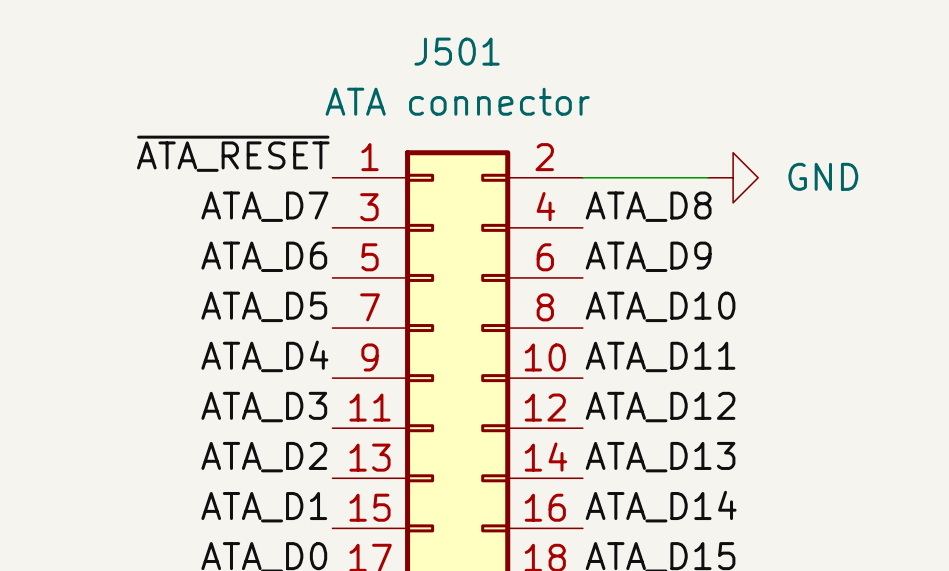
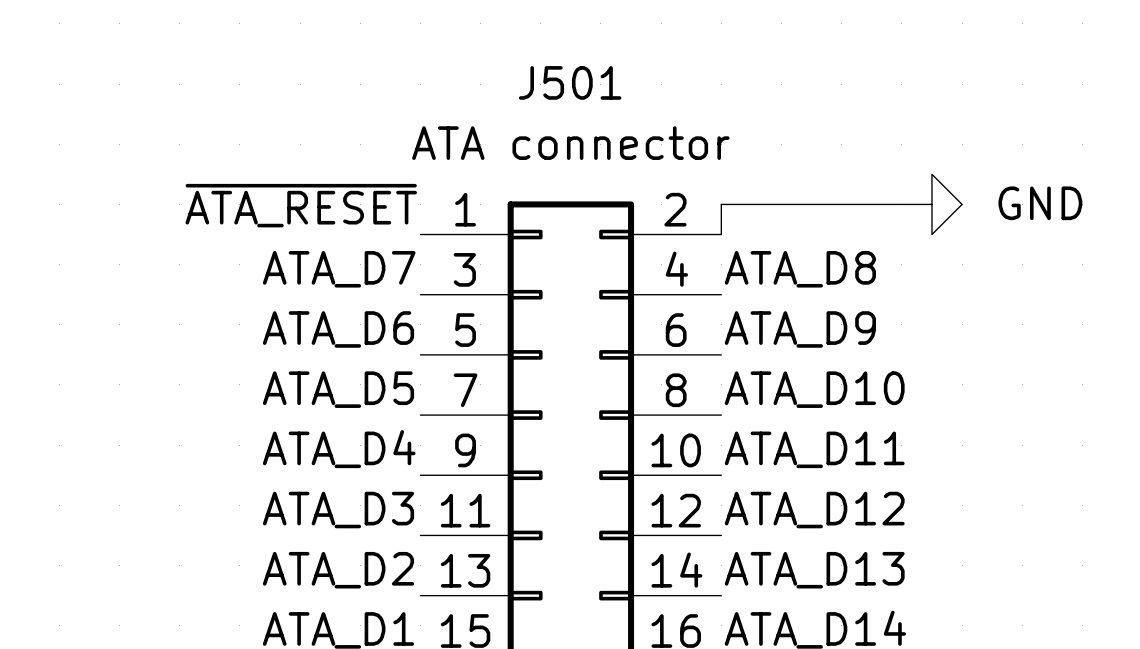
wire: (582, 177) (708, 177) -> (721, 234) (721, 204) (901, 204)
power symbol position: GND (733, 177) -> GND (931, 204)

